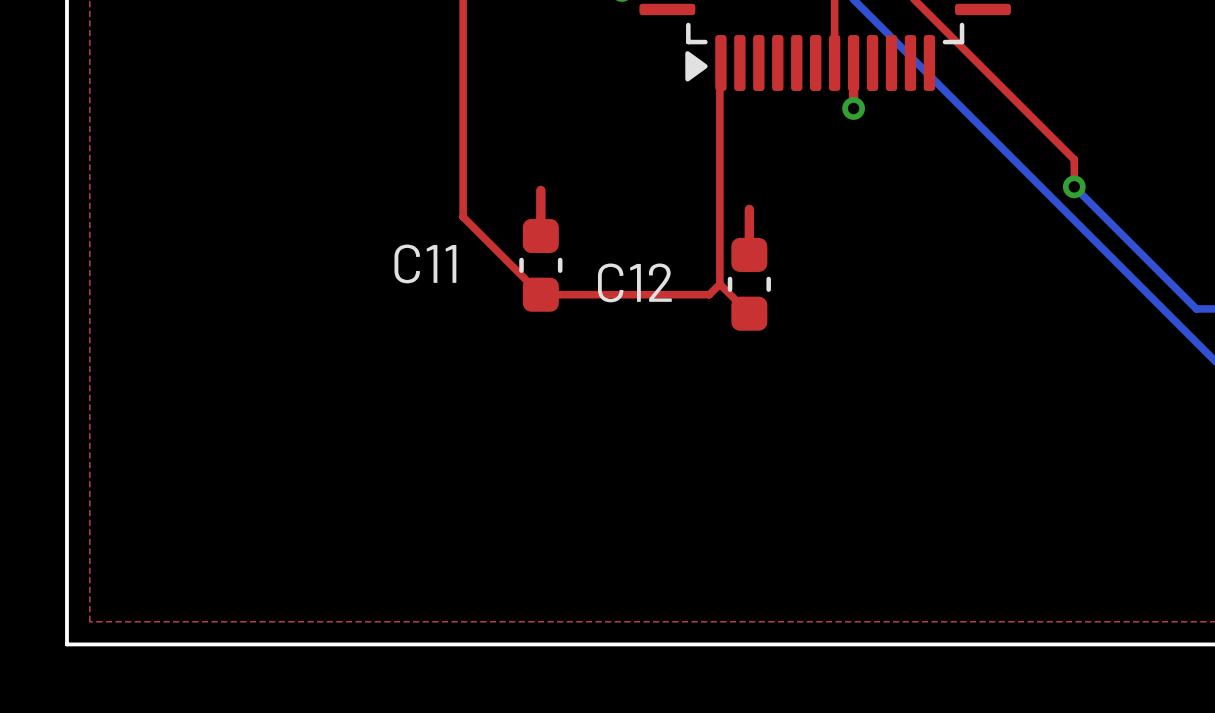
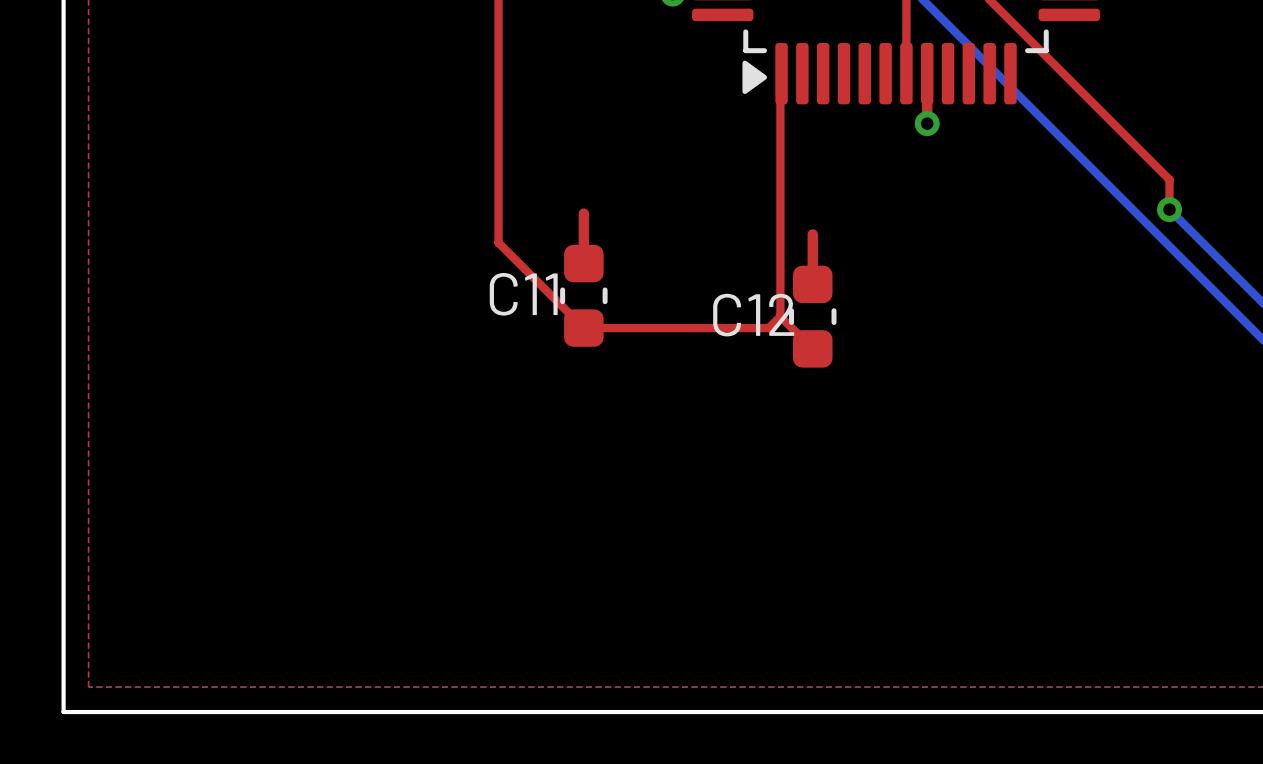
C11 name position: C11 (425, 263) -> C11 (523, 294)
C12 name position: C12 (634, 282) -> C12 (753, 315)

